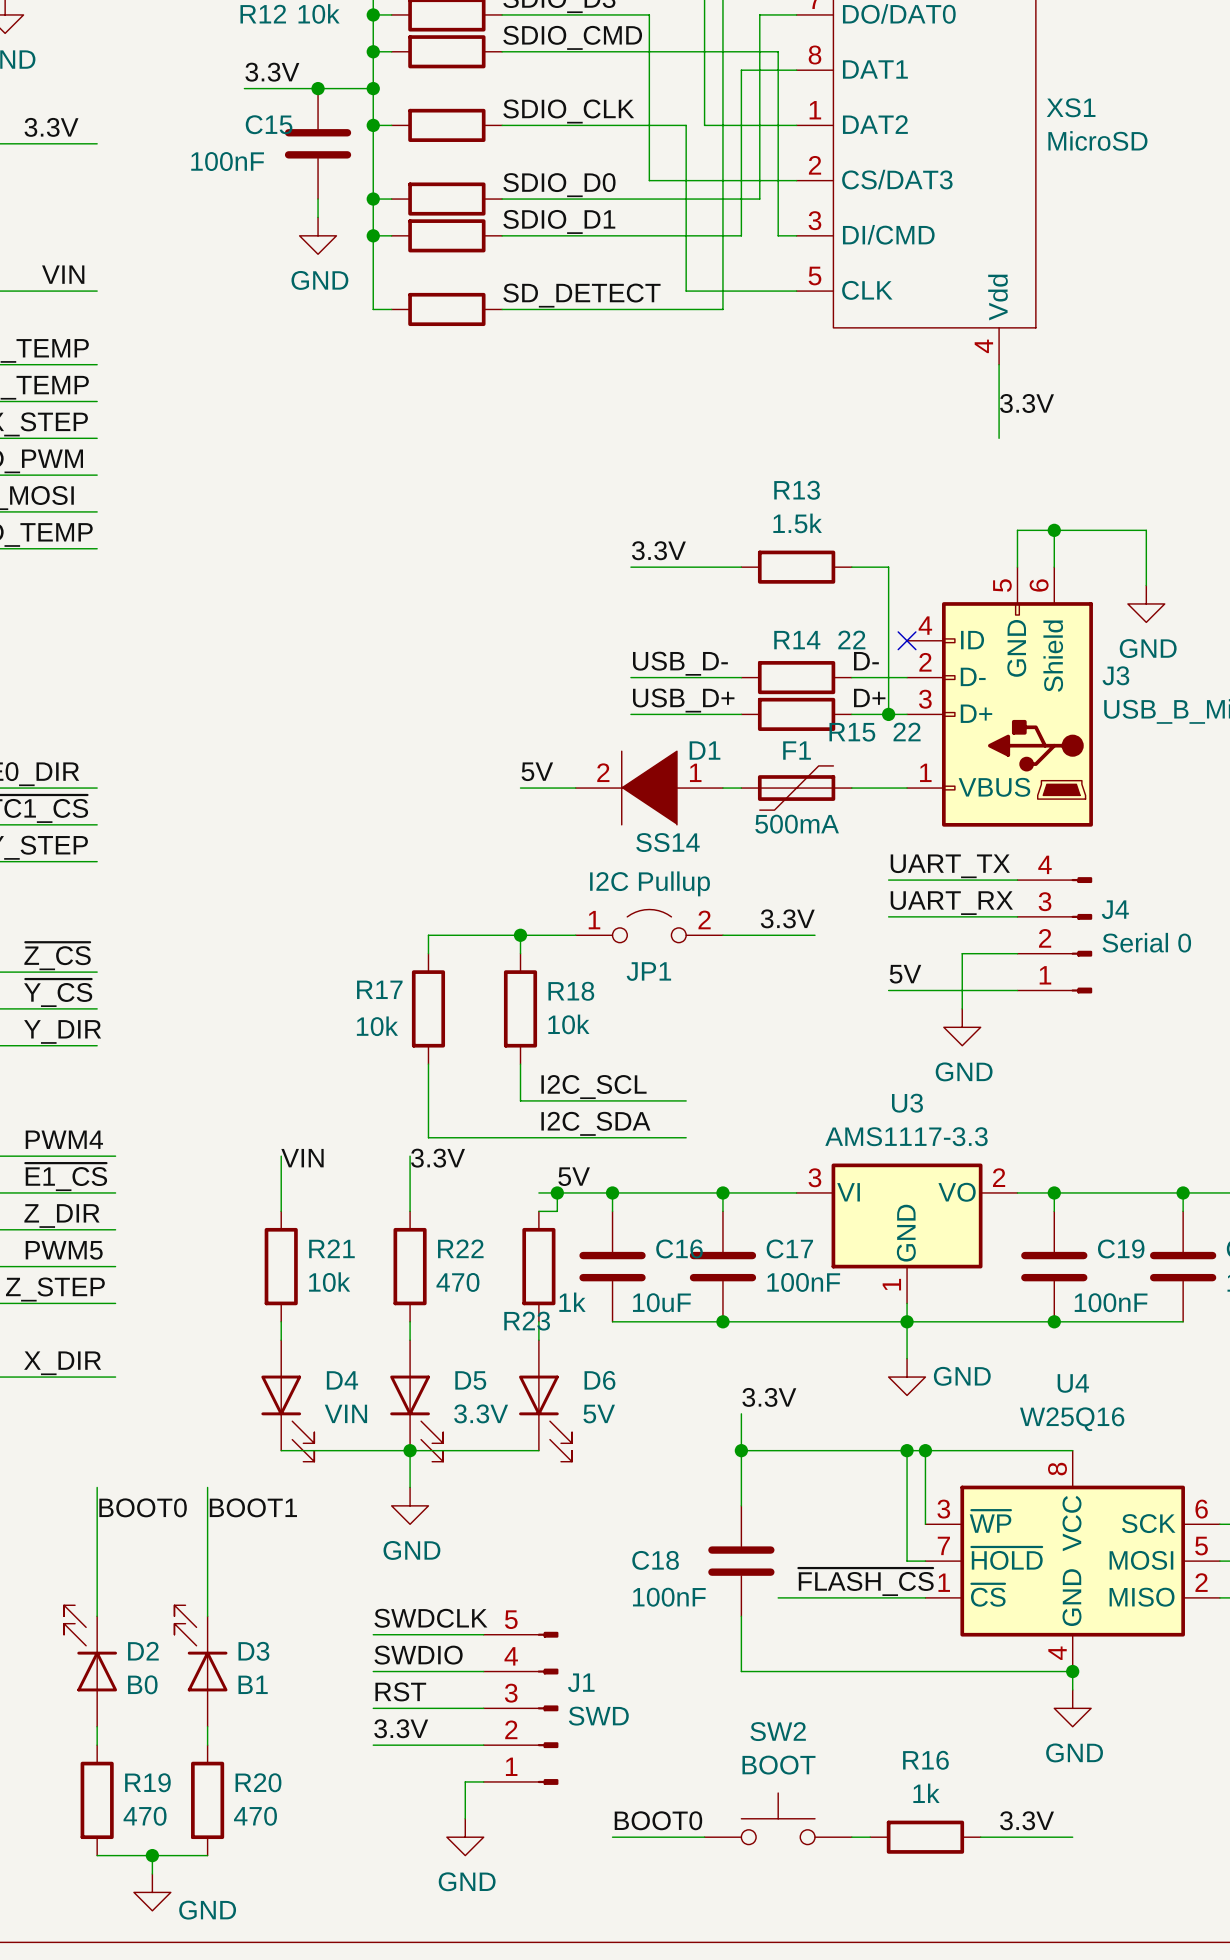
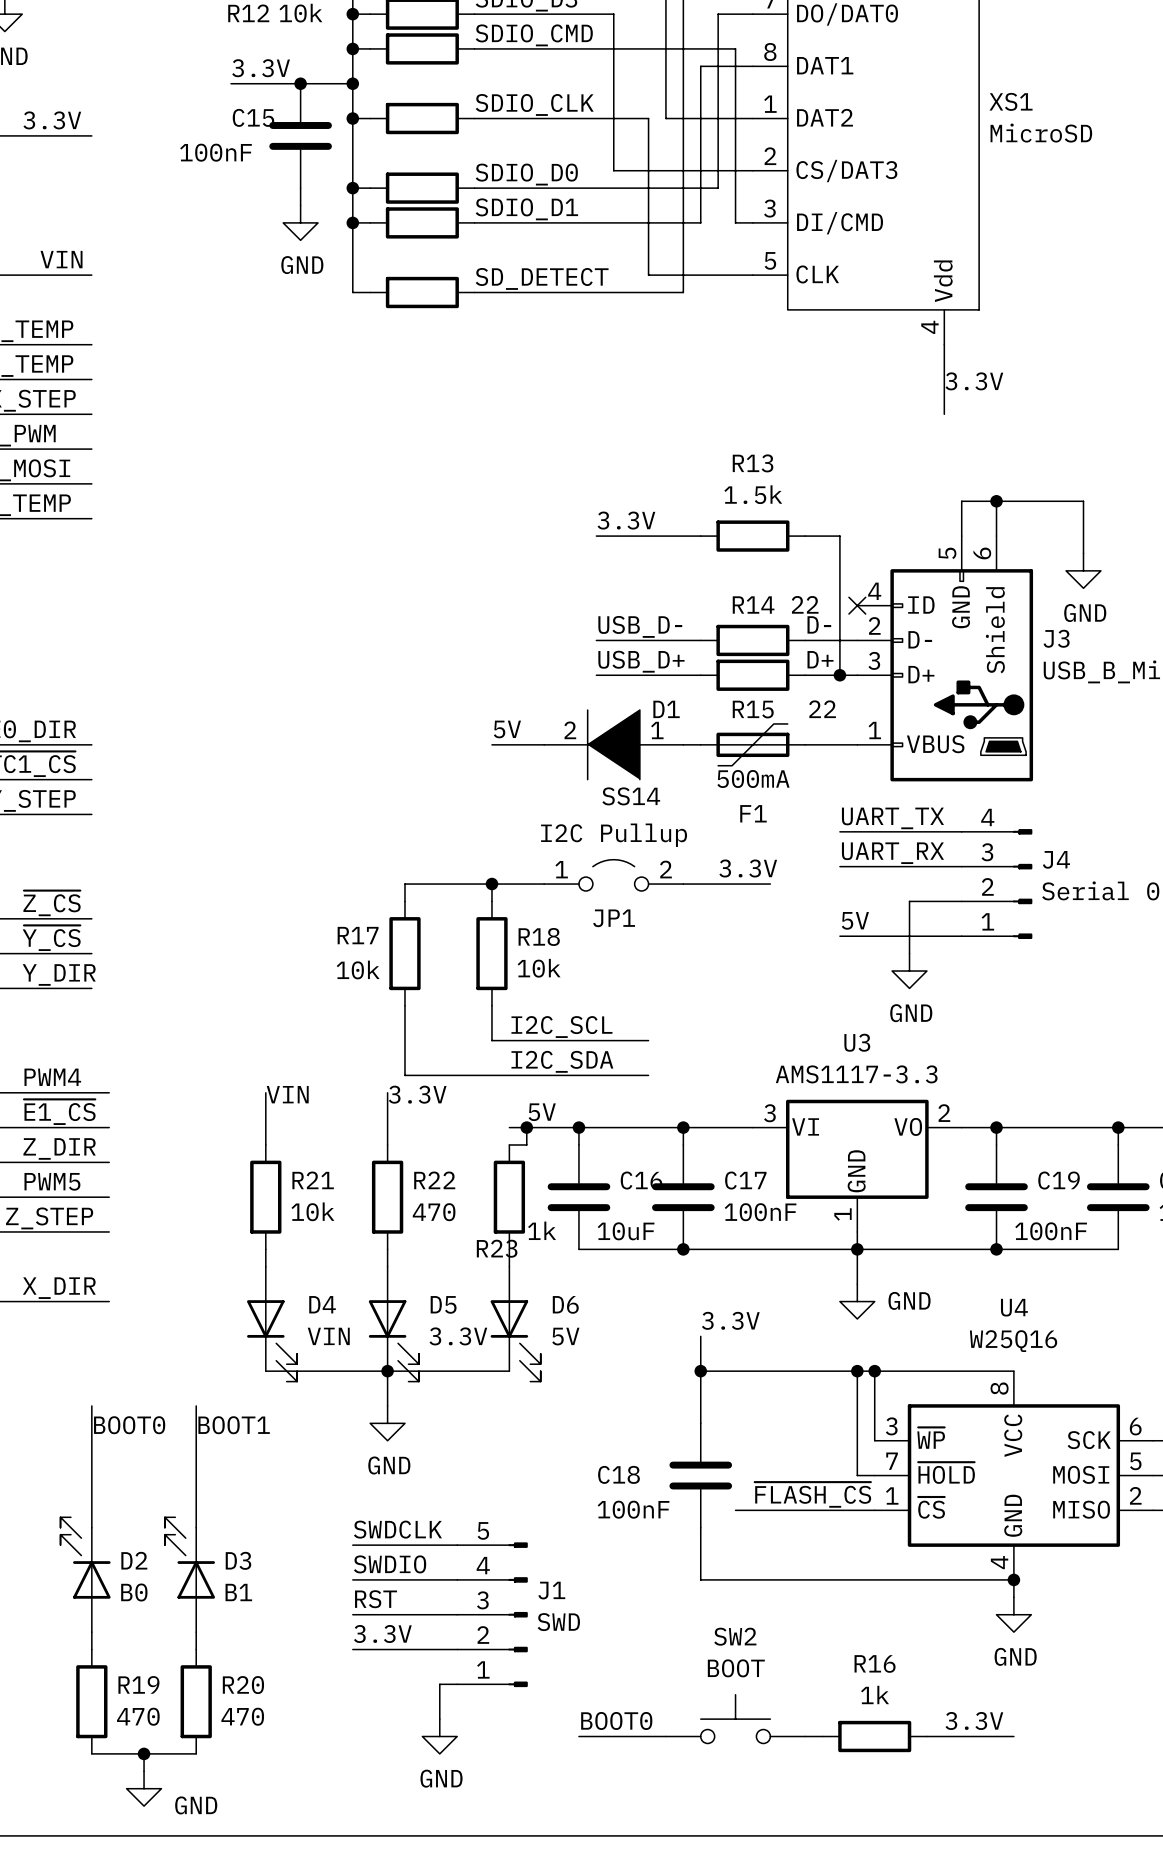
R15 value position: 22 (907, 731) -> 22 (822, 709)
R15 name position: R15 (852, 732) -> R15 (753, 709)
F1 name position: F1 (797, 750) -> F1 (753, 813)

